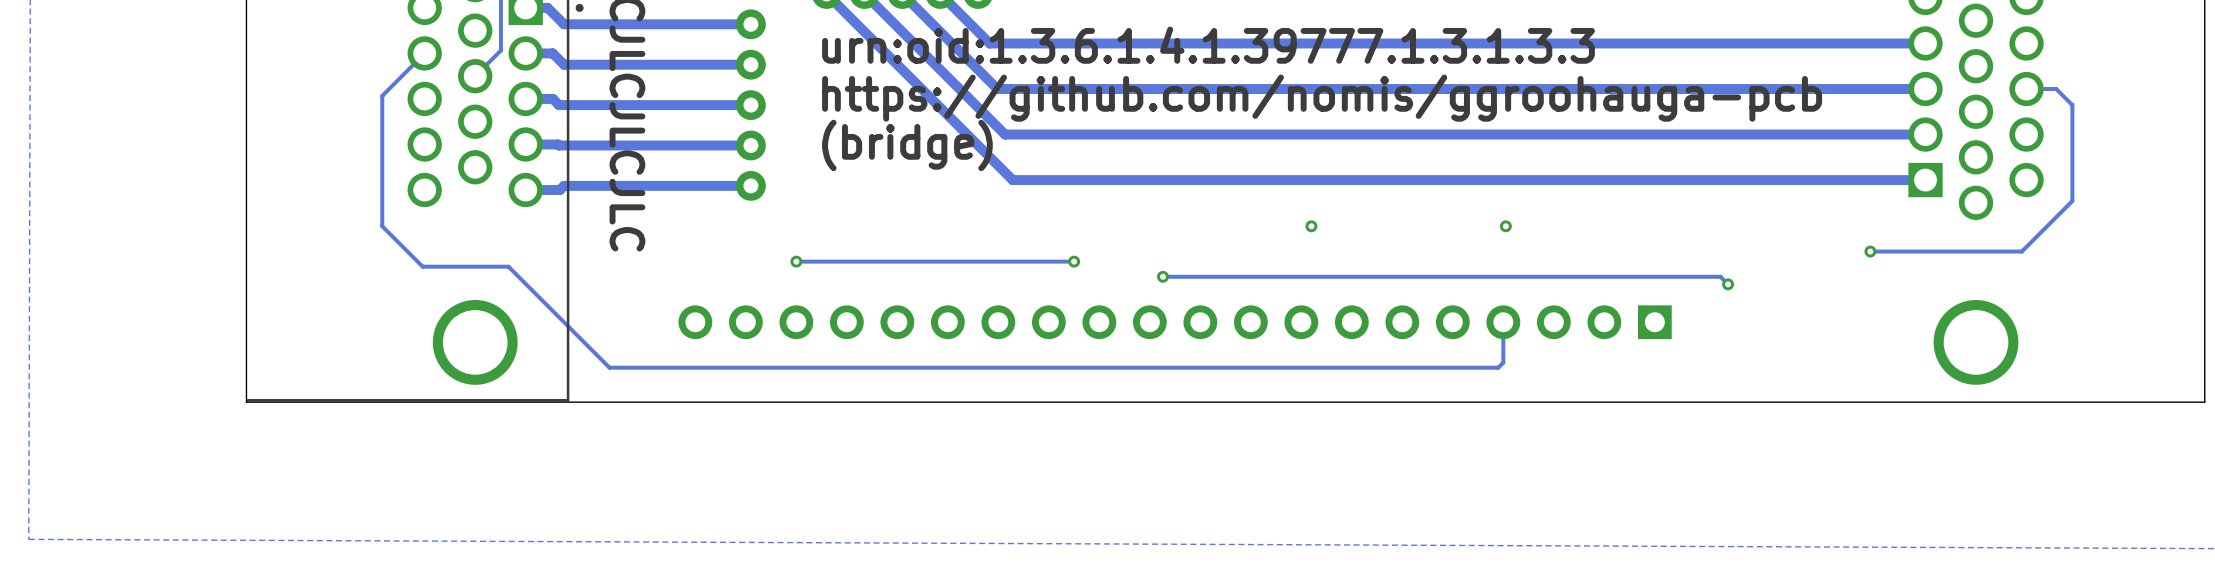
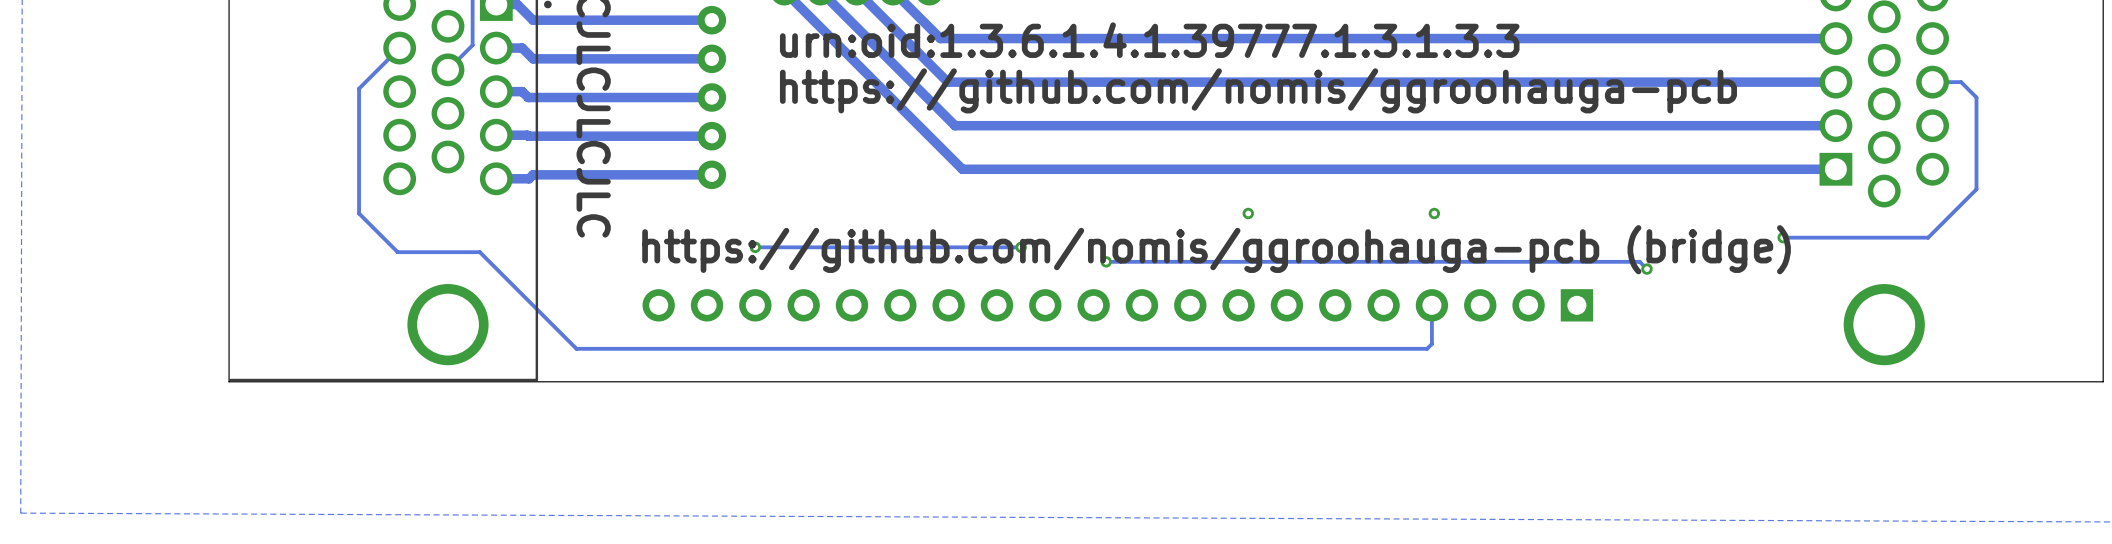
text: (bridge) (907, 145) -> none
text: none -> https://github.com/nomis/ggroohauga-pcb (bridge) (1216, 249)

